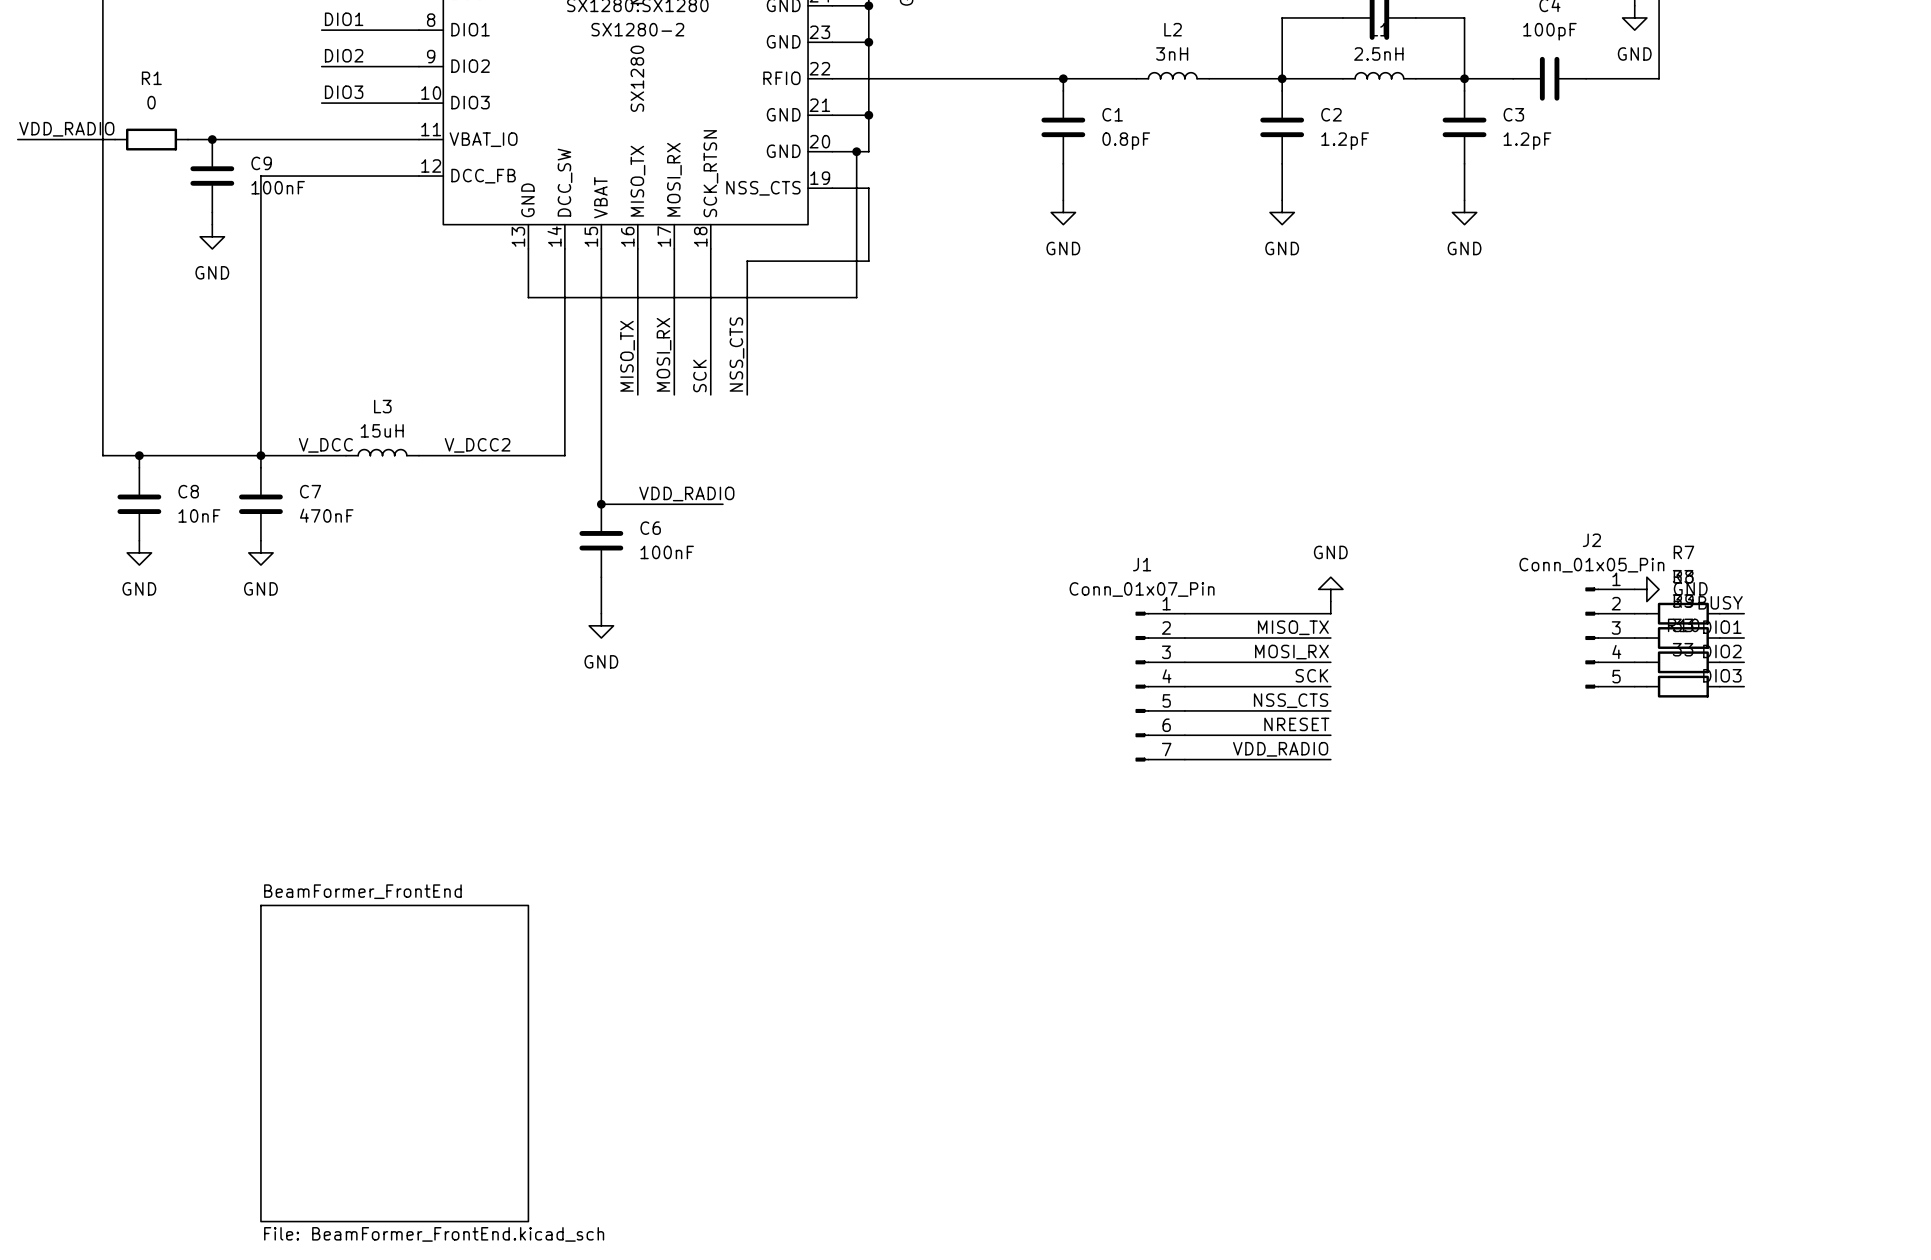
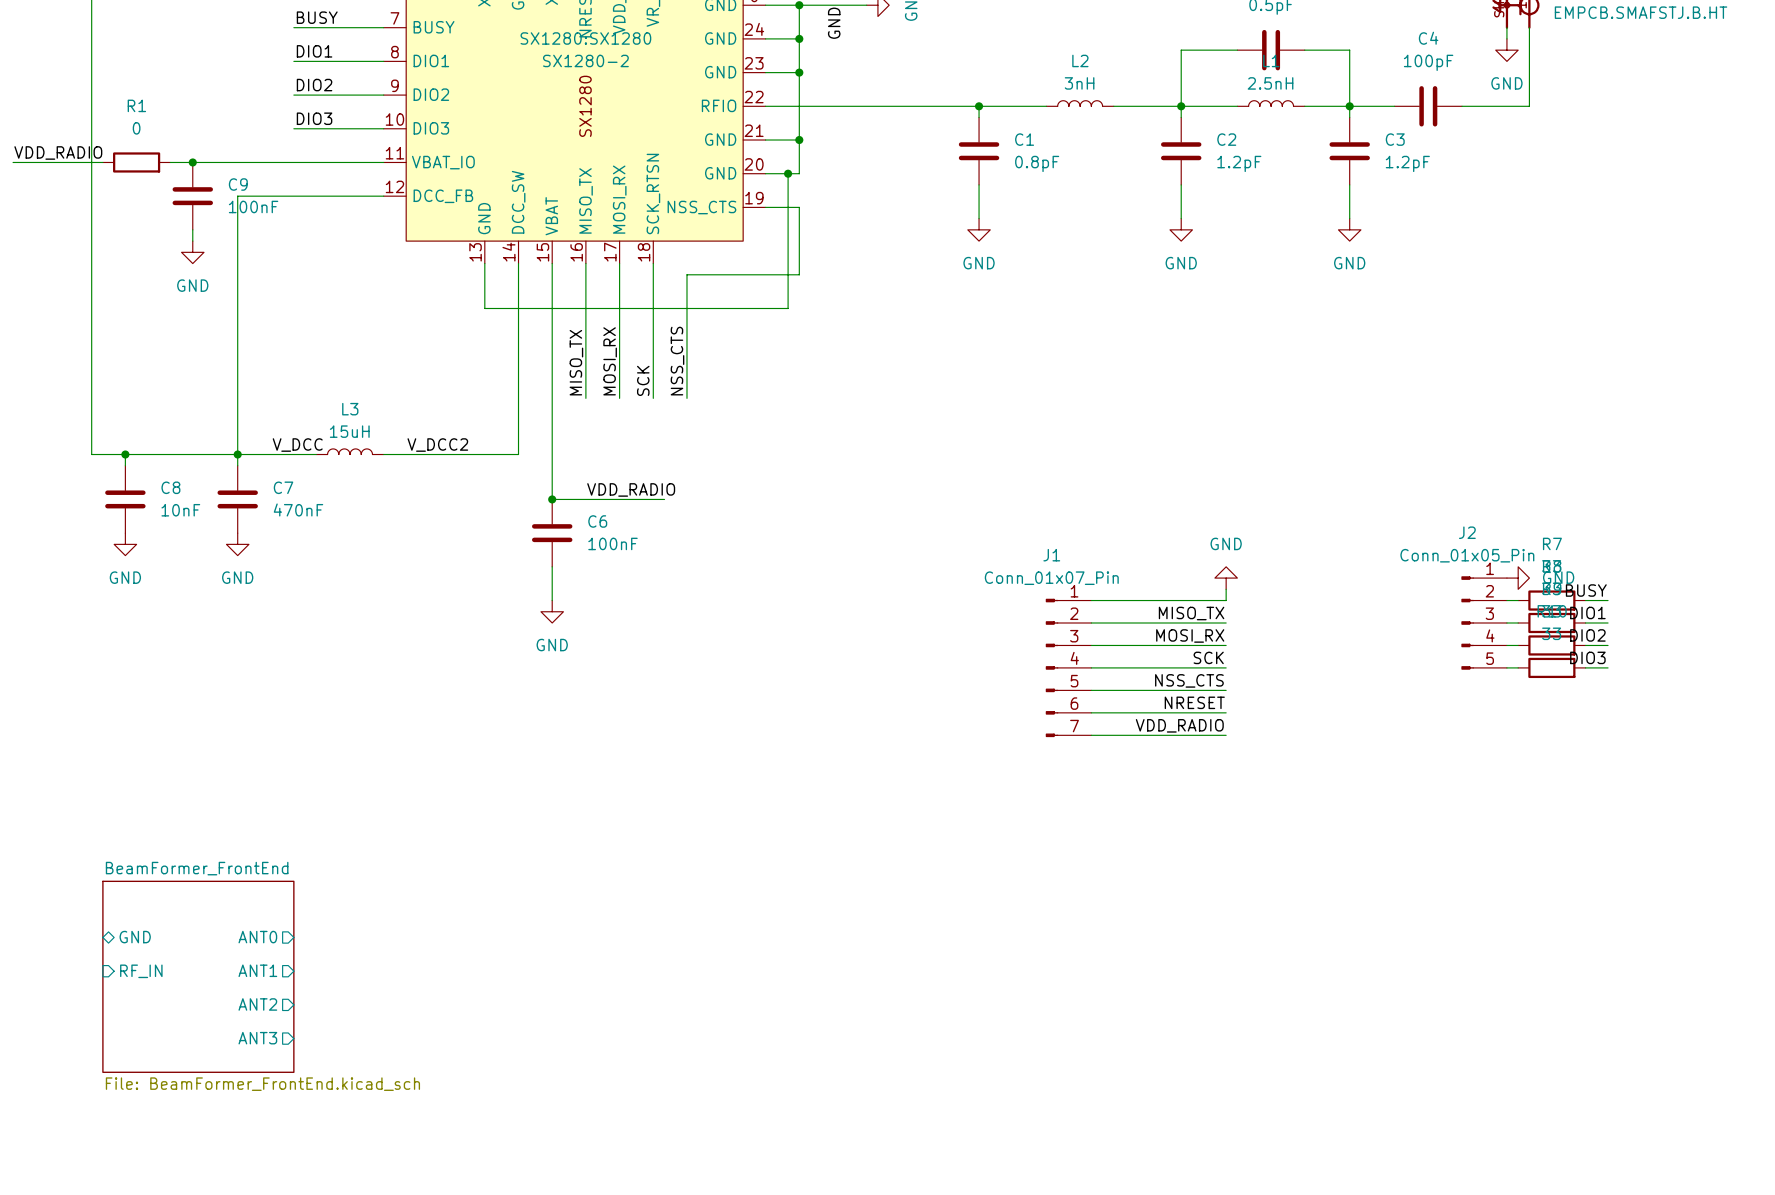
sheet pin: none -> GND (135, 937)
sheet pin: none -> ANT0 (257, 937)
sheet pin: none -> ANT1 (257, 970)
sheet pin: none -> RF_IN (141, 971)
sheet BeamFormer_FrontEnd: none -> File: BeamFormer_FrontEnd.kicad_sch (198, 976)
sheet pin: none -> ANT2 (257, 1004)
sheet BeamFormer_FrontEnd: File: BeamFormer_FrontEnd.kicad_sch (394, 1063) -> none
sheet pin: none -> ANT3 (257, 1038)

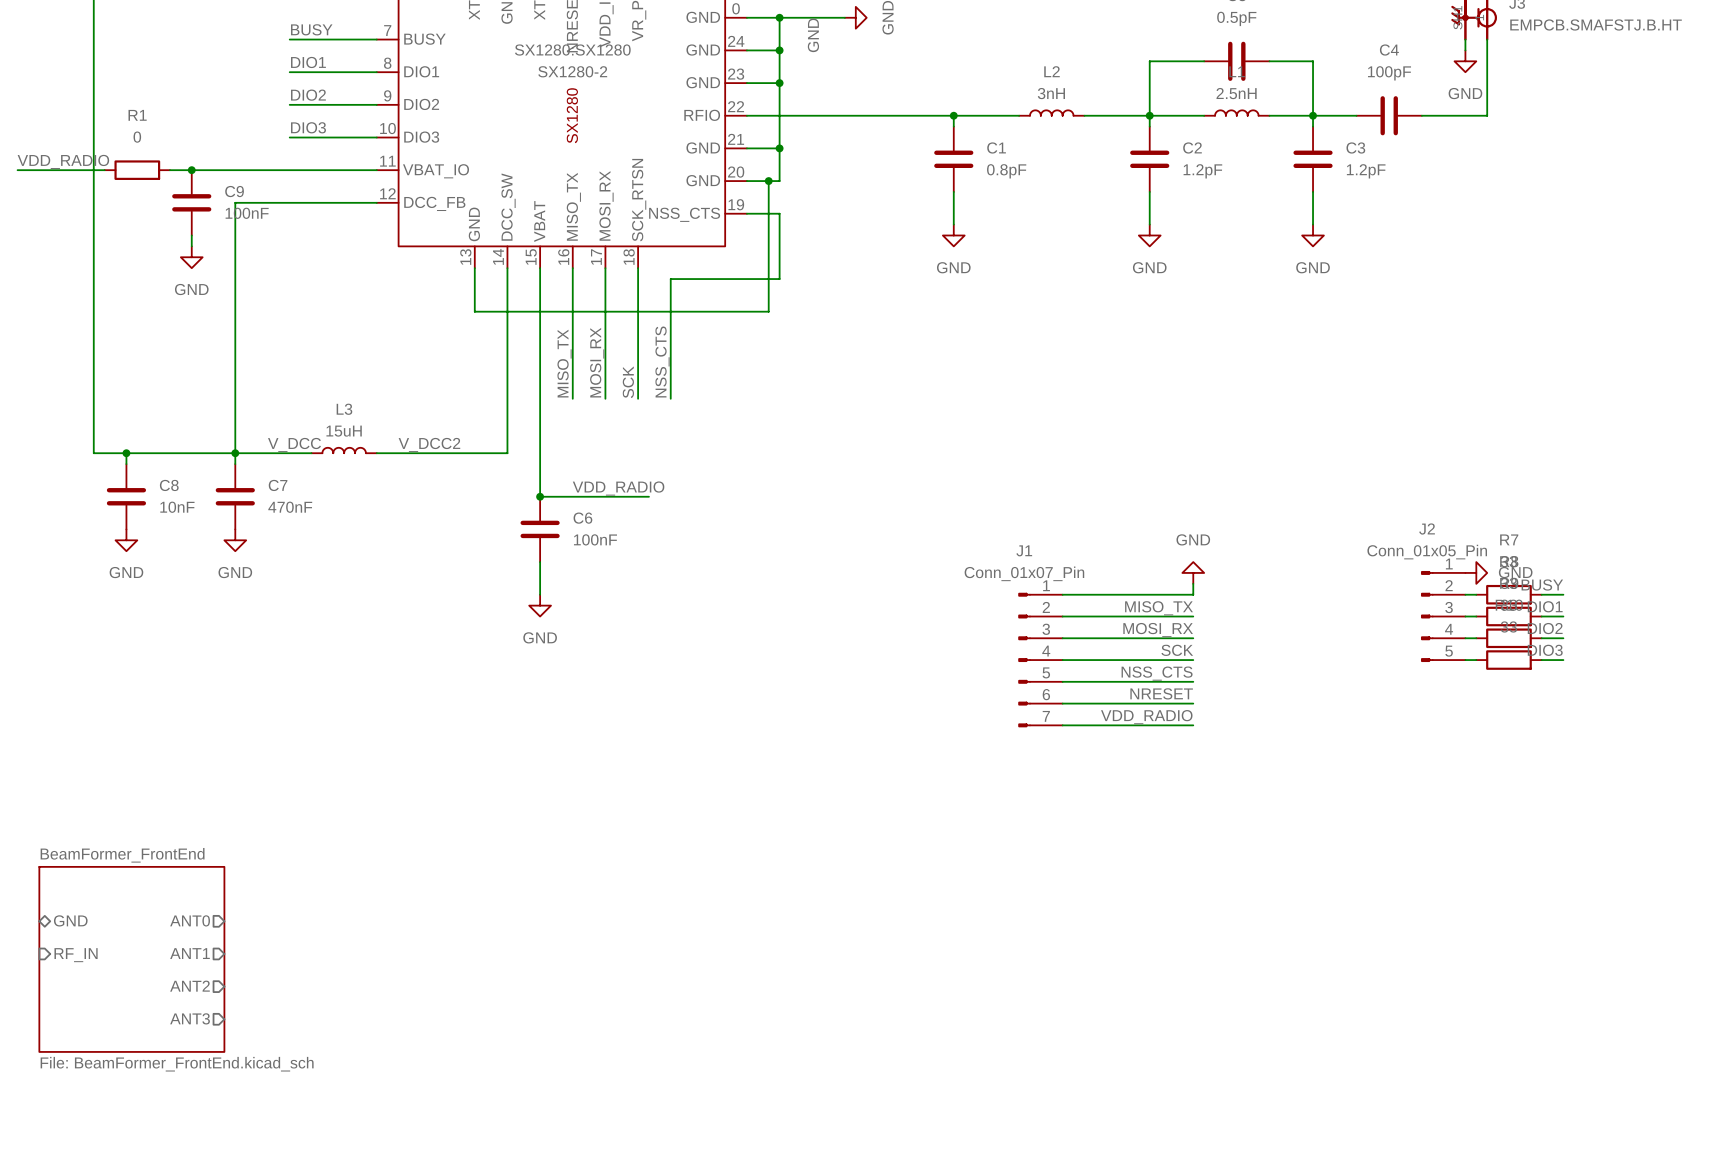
sheet pin position: GND (135, 937) -> GND (70, 920)
sheet pin position: ANT0 (257, 937) -> ANT0 (190, 920)
sheet pin position: ANT1 (257, 970) -> ANT1 (189, 953)
sheet pin position: RF_IN (141, 971) -> RF_IN (76, 955)
sheet BeamFormer_FrontEnd position: (198, 976) -> (131, 959)
sheet pin position: ANT2 (257, 1004) -> ANT2 (189, 986)
sheet pin position: ANT3 (257, 1038) -> ANT3 (190, 1018)

